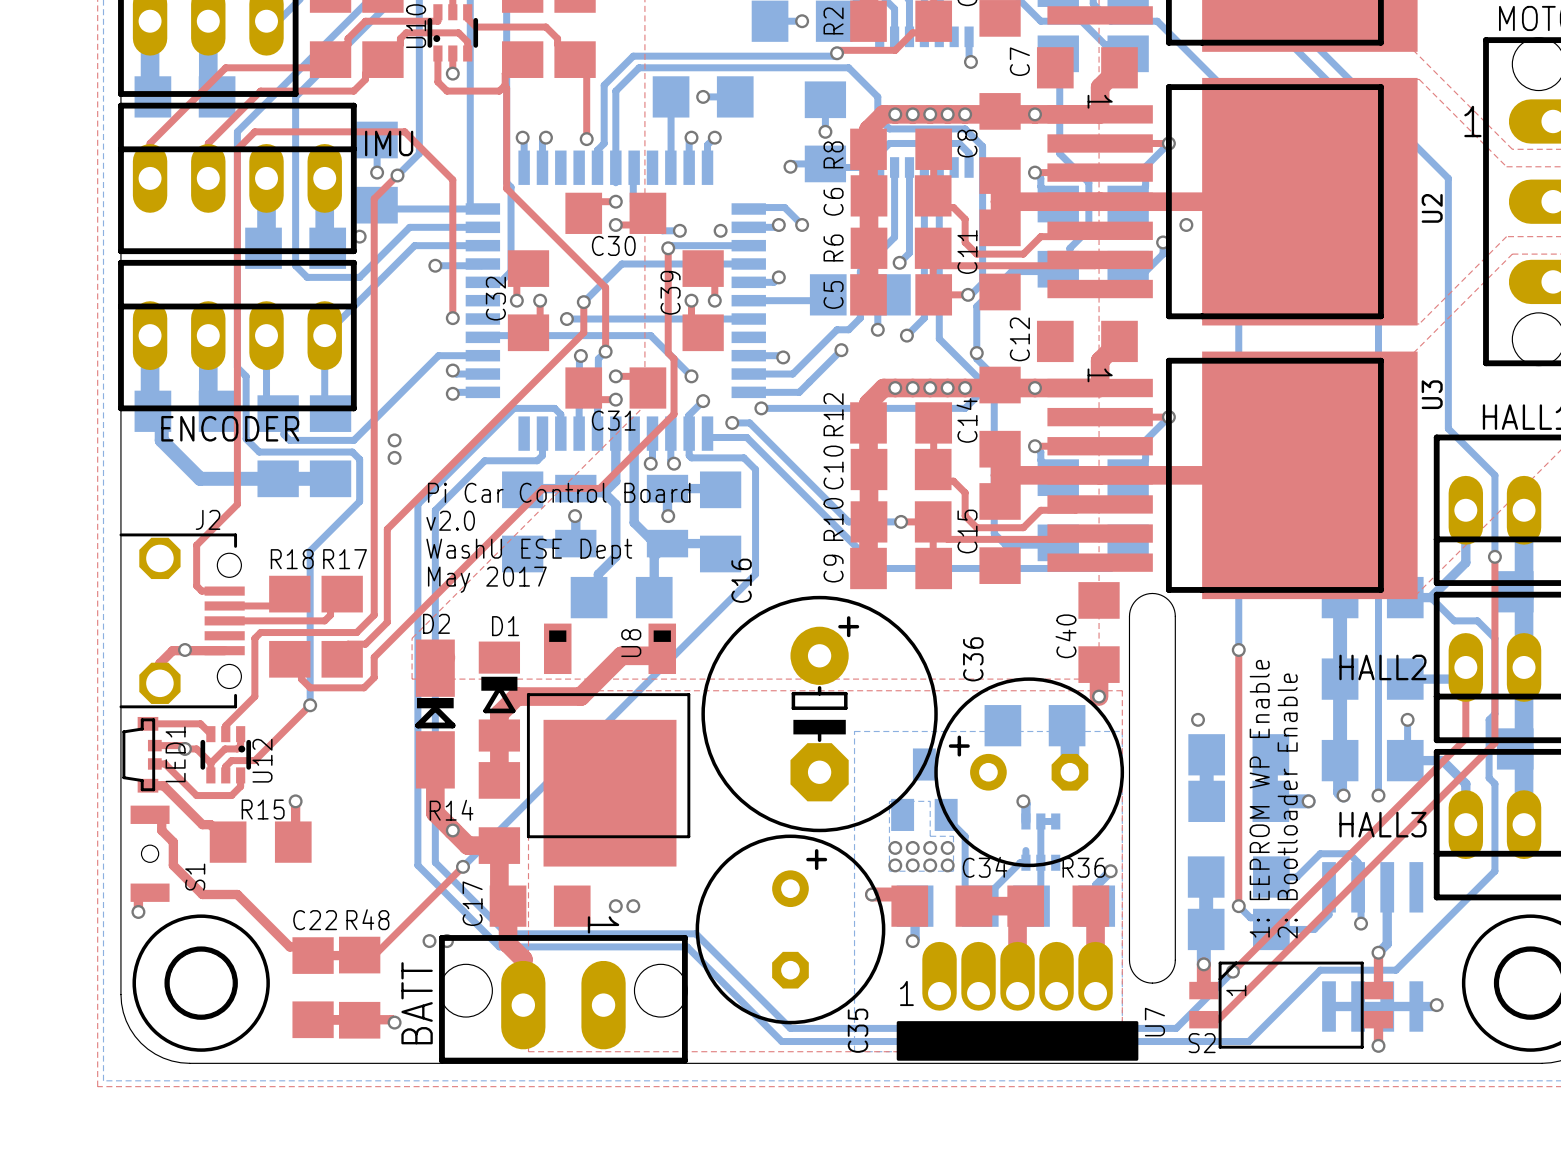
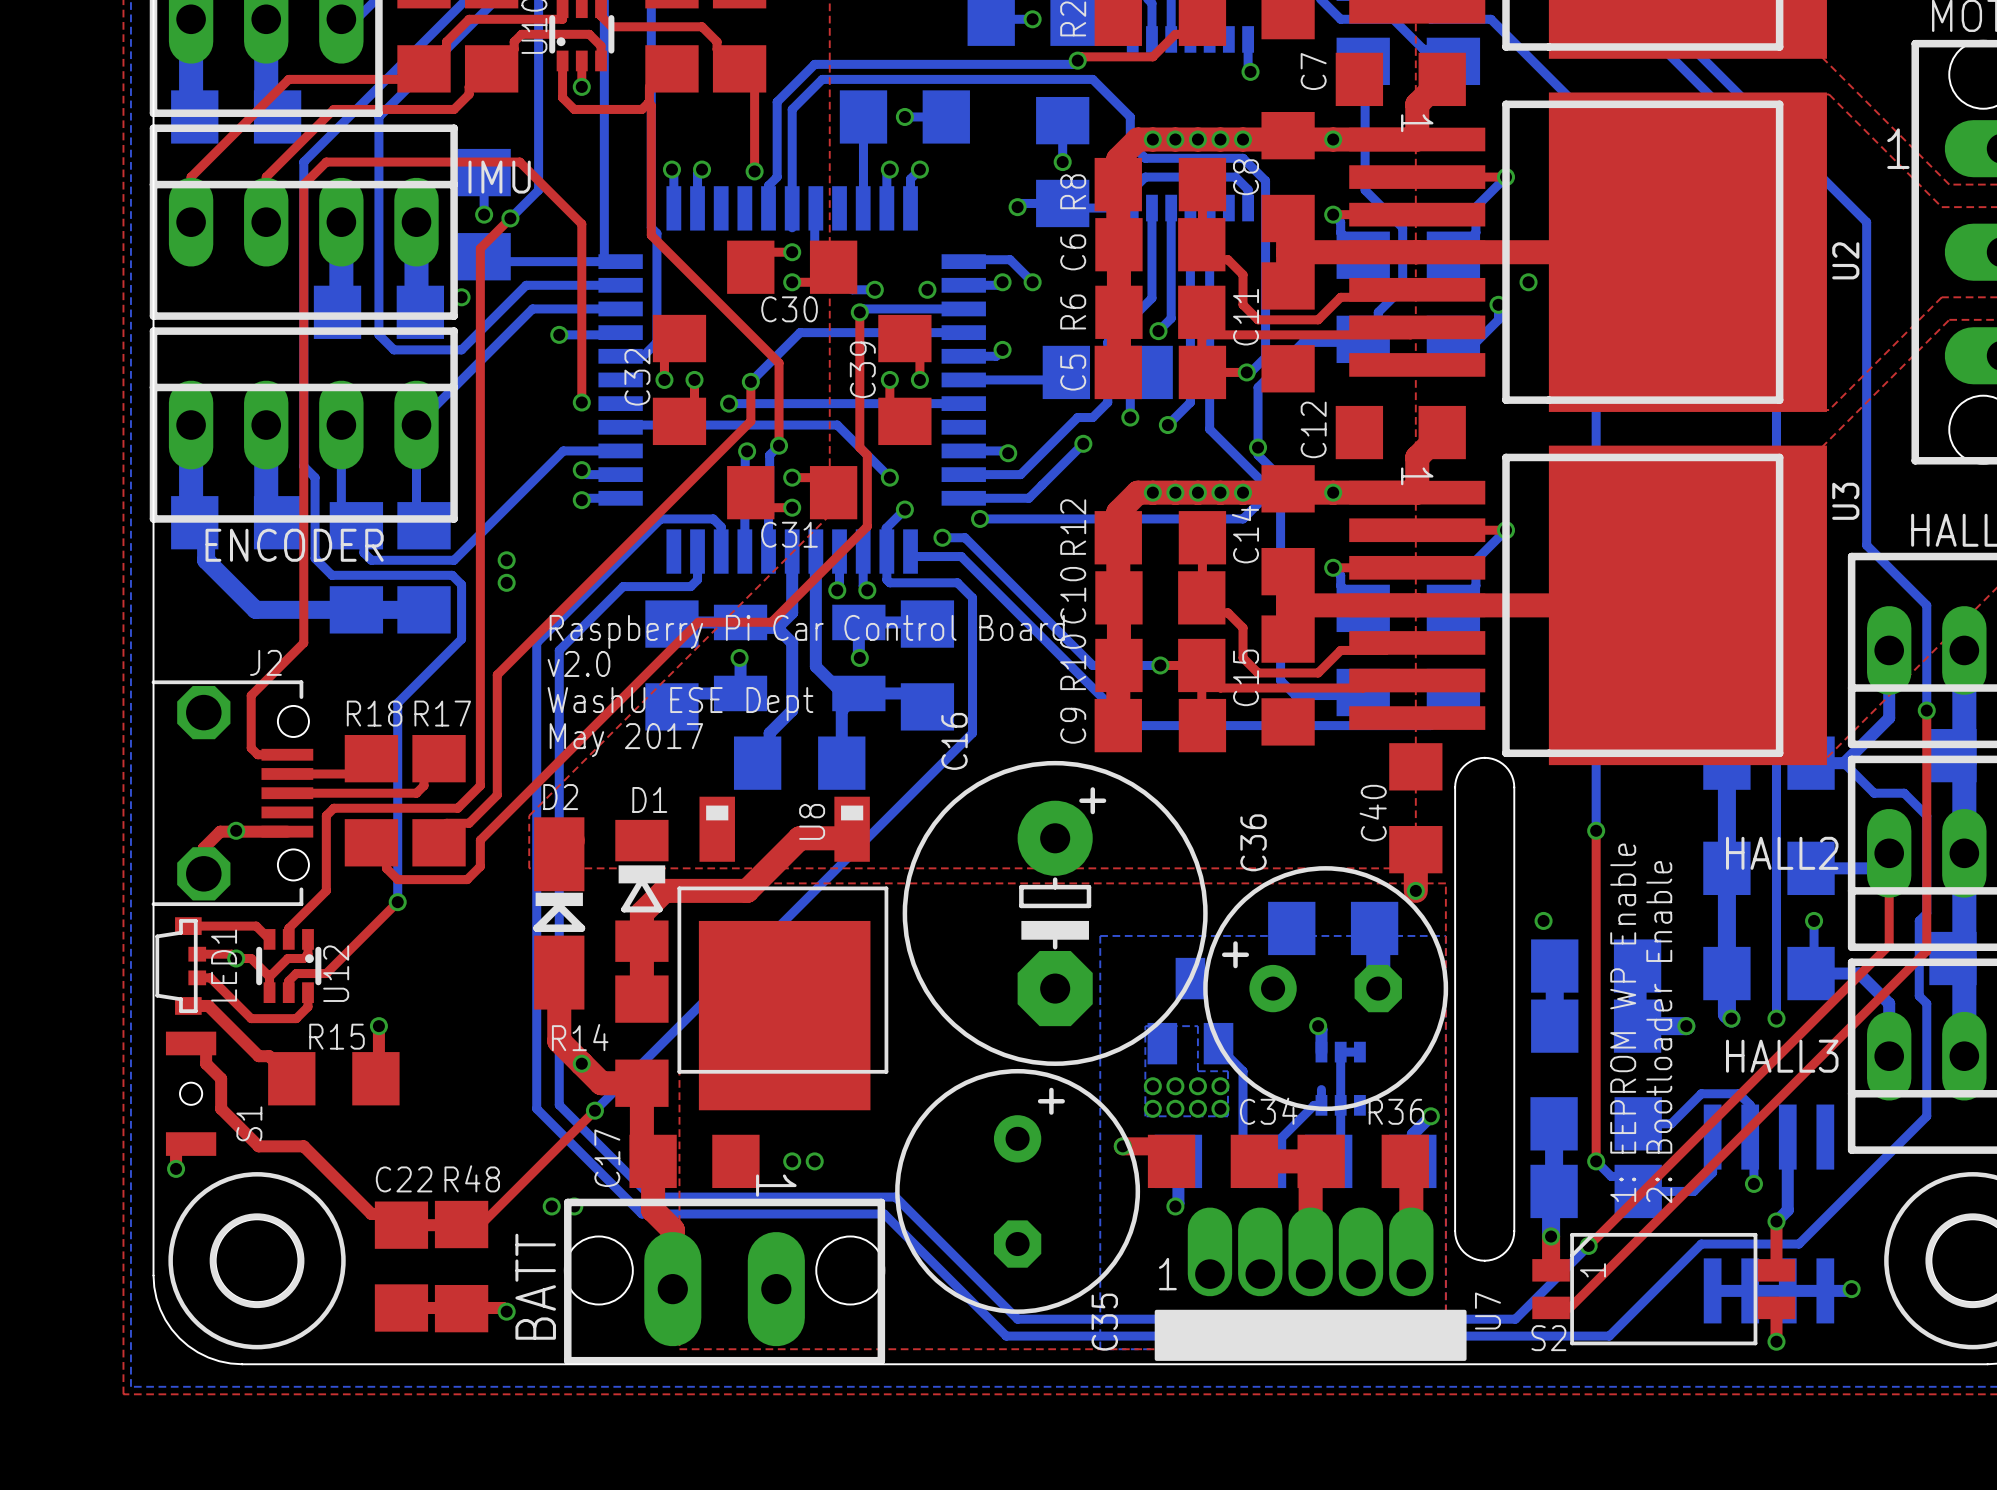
text: Pi Car Control Board (559, 492) -> Raspberry Pi Car Control Board (807, 631)

